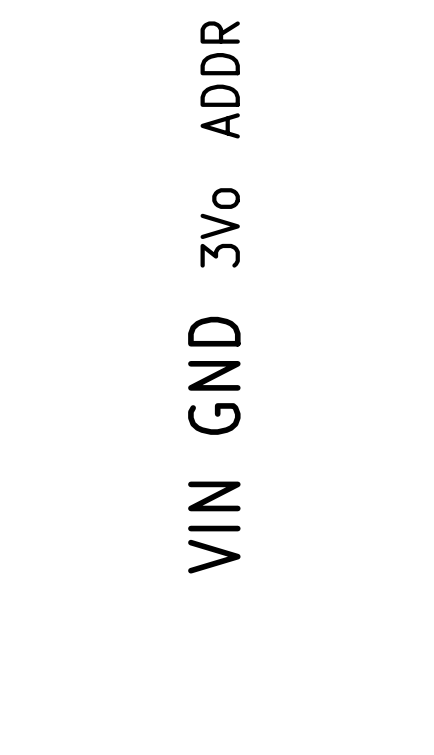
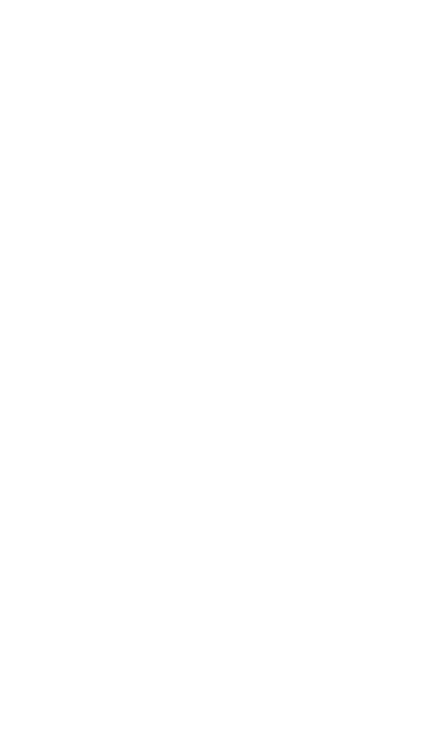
text: ADDR (220, 79) -> none
text: 3Vo (220, 227) -> none
text: GND (214, 375) -> none
text: VIN (214, 527) -> none

